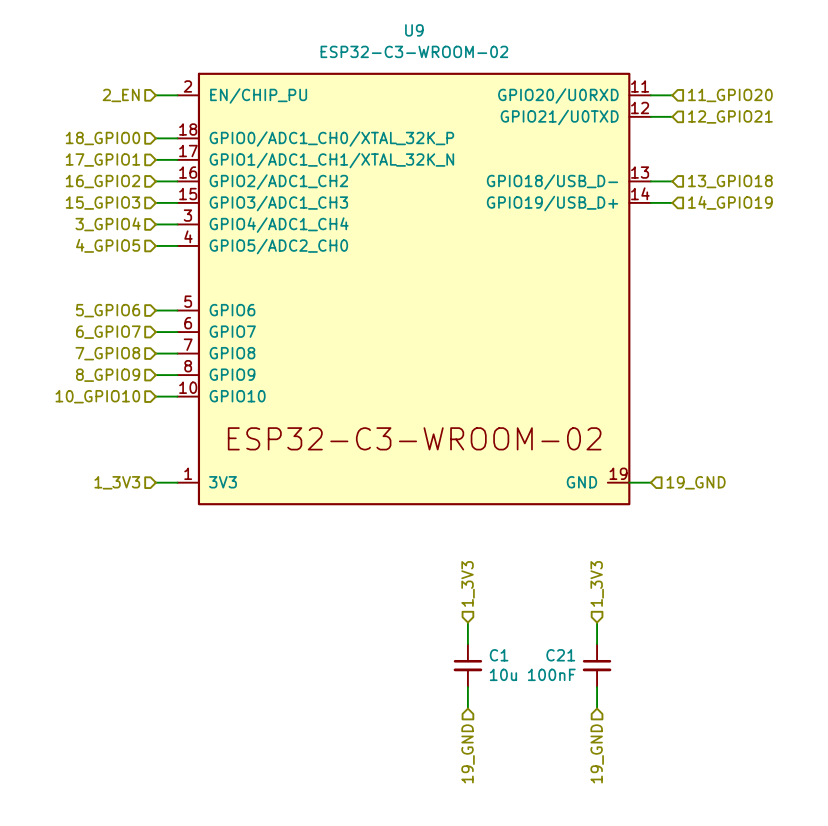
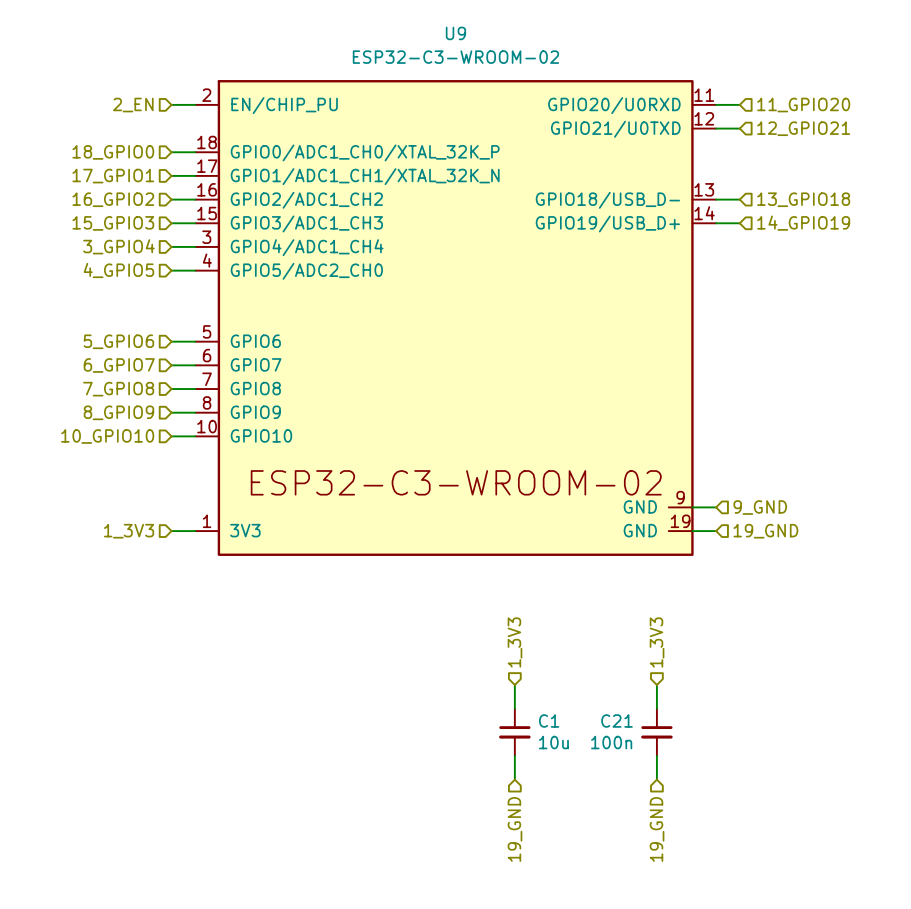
U9 symbol: [177, 72, 651, 506] -> [195, 80, 717, 556]
wire: none -> (692, 507) (716, 507)
hierarchical label: none -> 9_GND (760, 507)
C21 value: 100nF (551, 674) -> 100n (611, 742)

